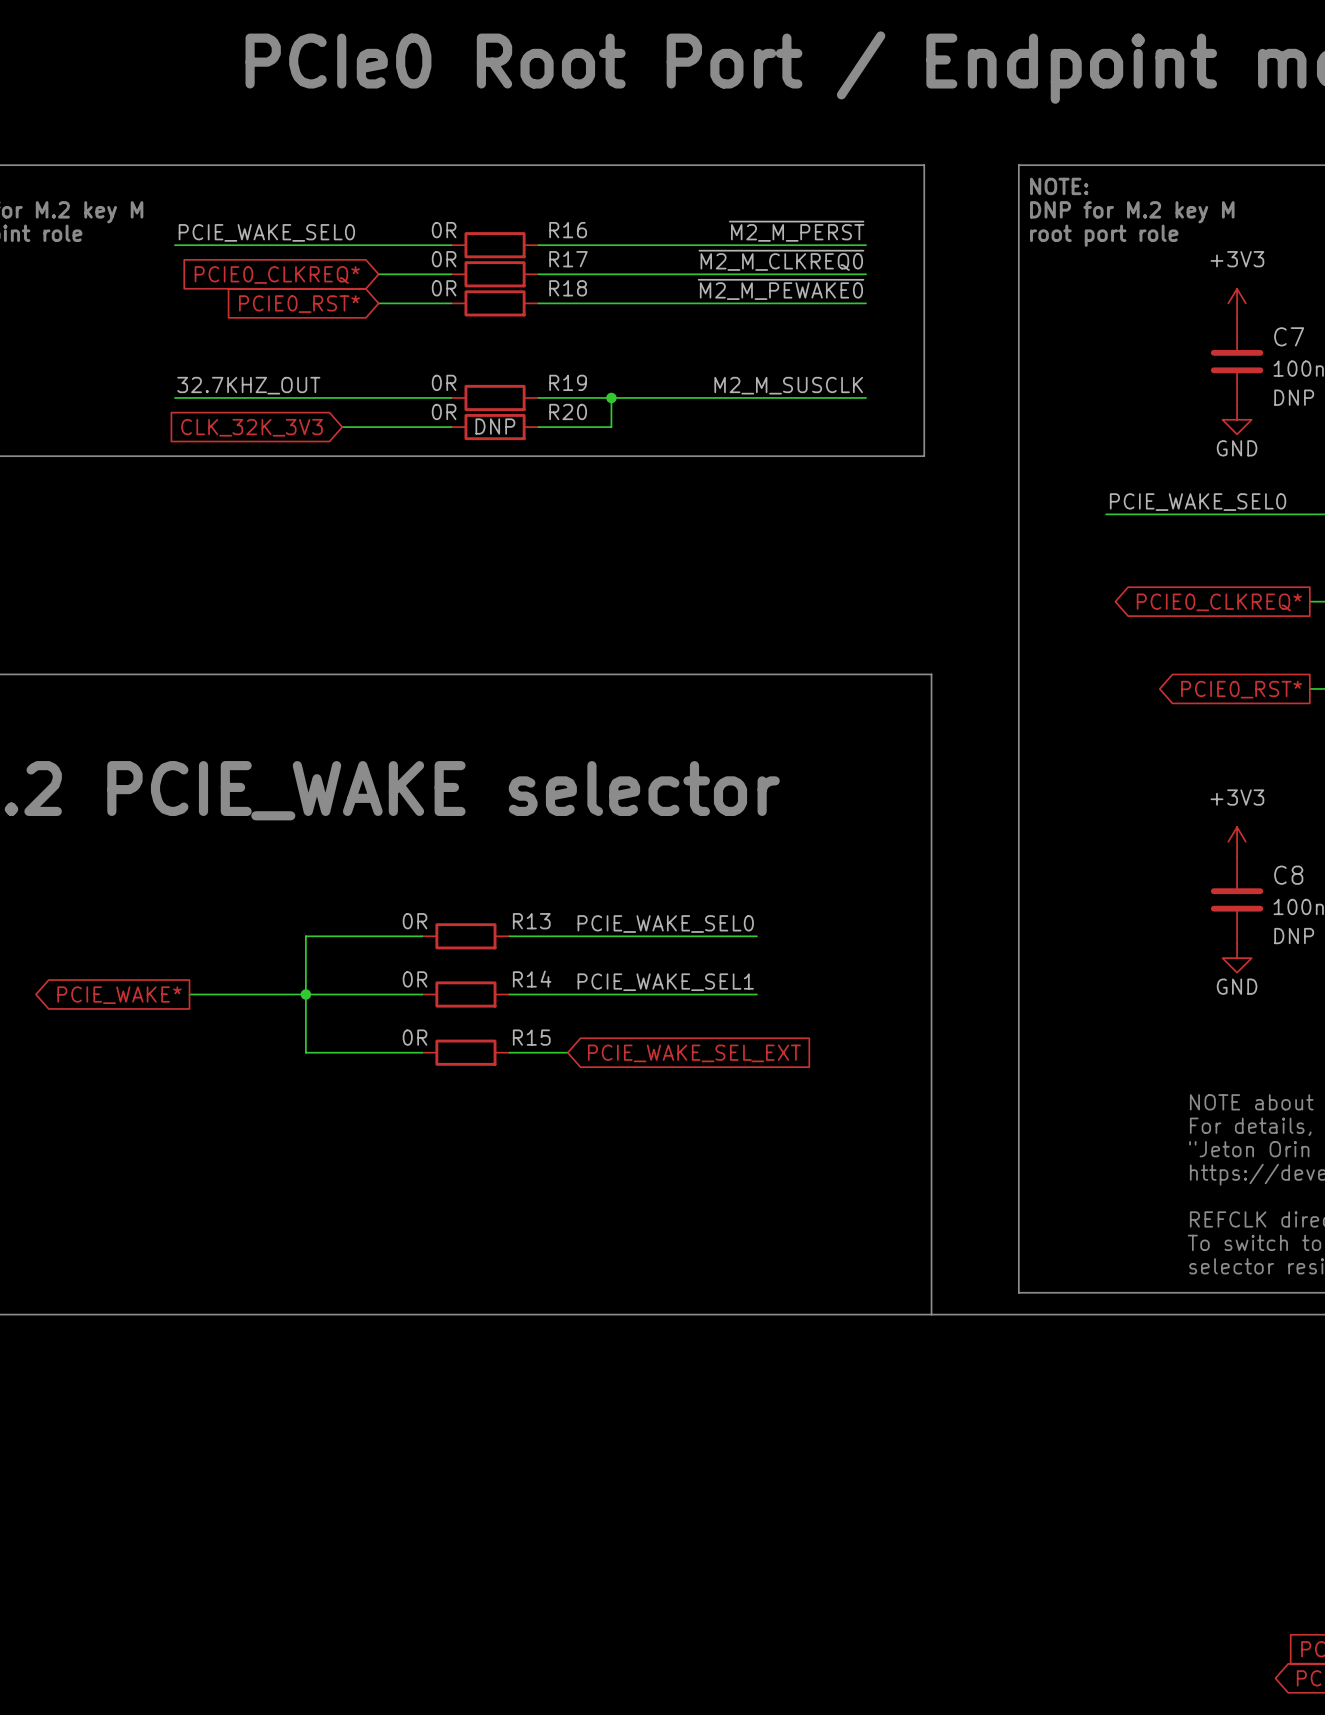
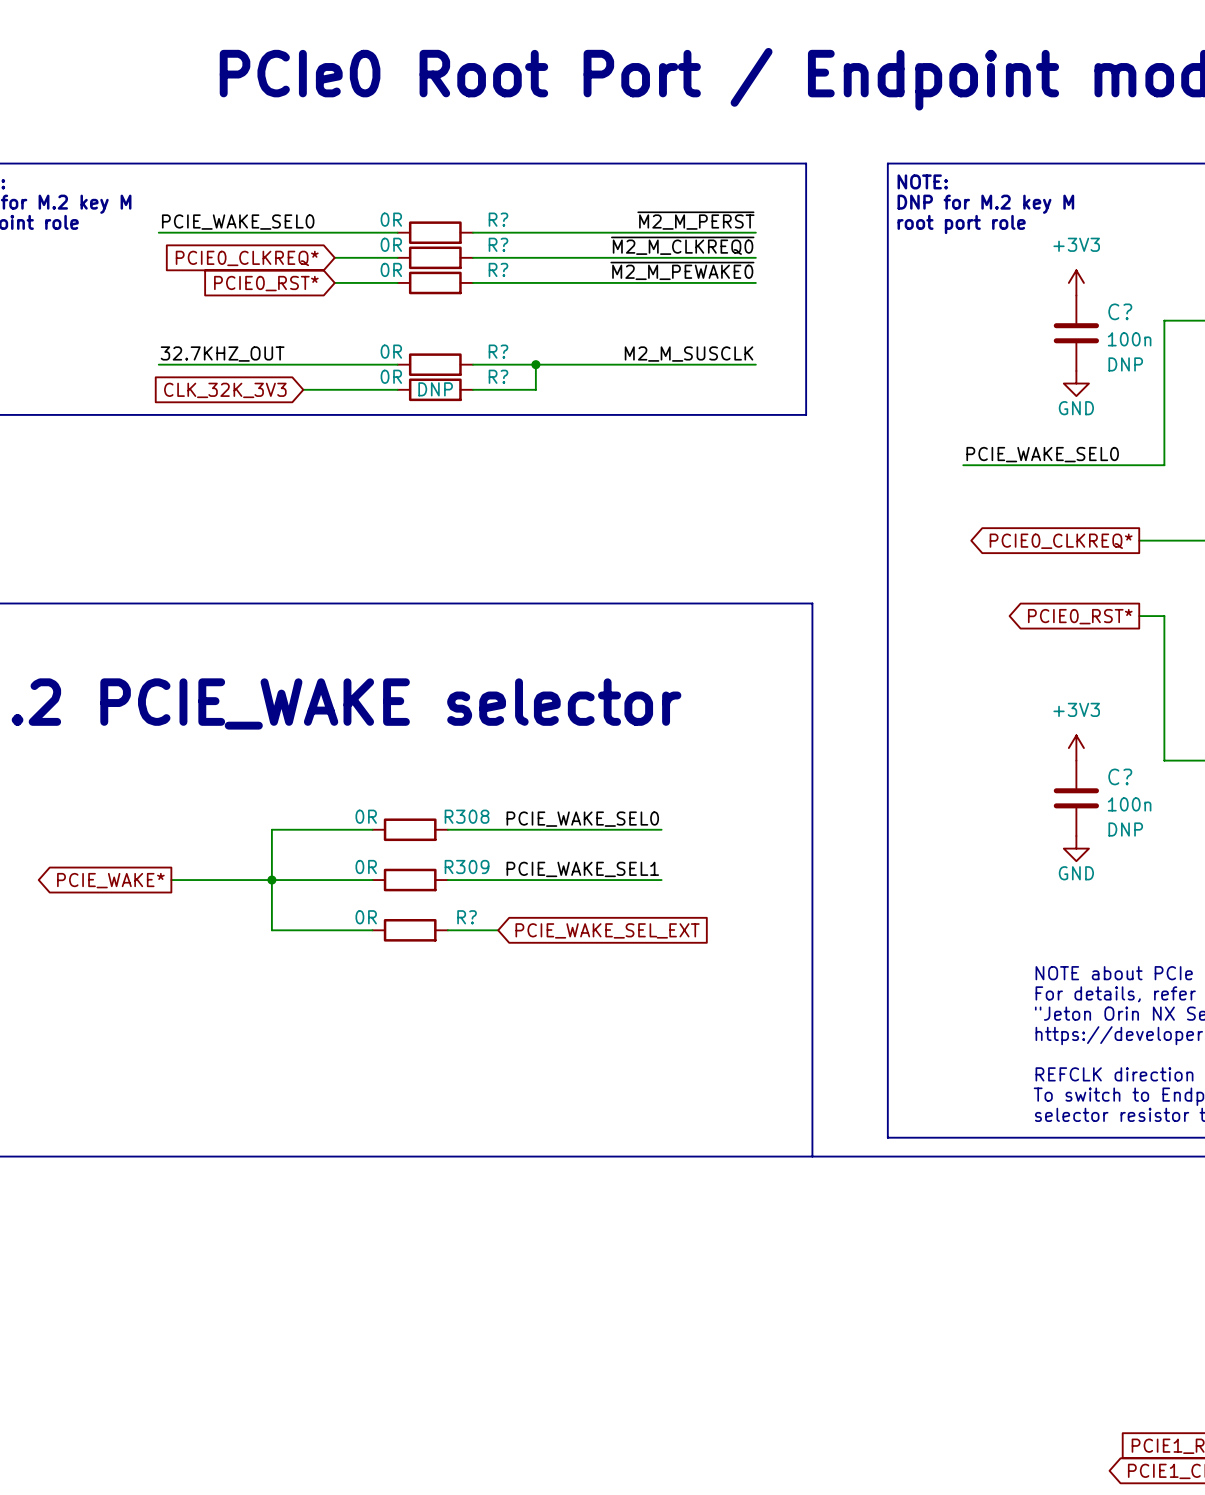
R16 name: R16 (568, 230) -> R? (498, 219)
R17 name: R17 (568, 259) -> R? (498, 244)
R18 name: R18 (568, 288) -> R? (498, 269)
C7 name: C7 (1289, 336) -> C? (1120, 311)
R19 name: R19 (568, 382) -> R? (498, 351)
R20 name: R20 (568, 411) -> R? (498, 376)
C8 name: C8 (1288, 875) -> C? (1120, 776)
R13 name: R13 (531, 921) -> R308 (467, 816)
R14 name: R14 (532, 979) -> R309 (467, 866)
R15 name: R15 (531, 1037) -> R? (467, 917)

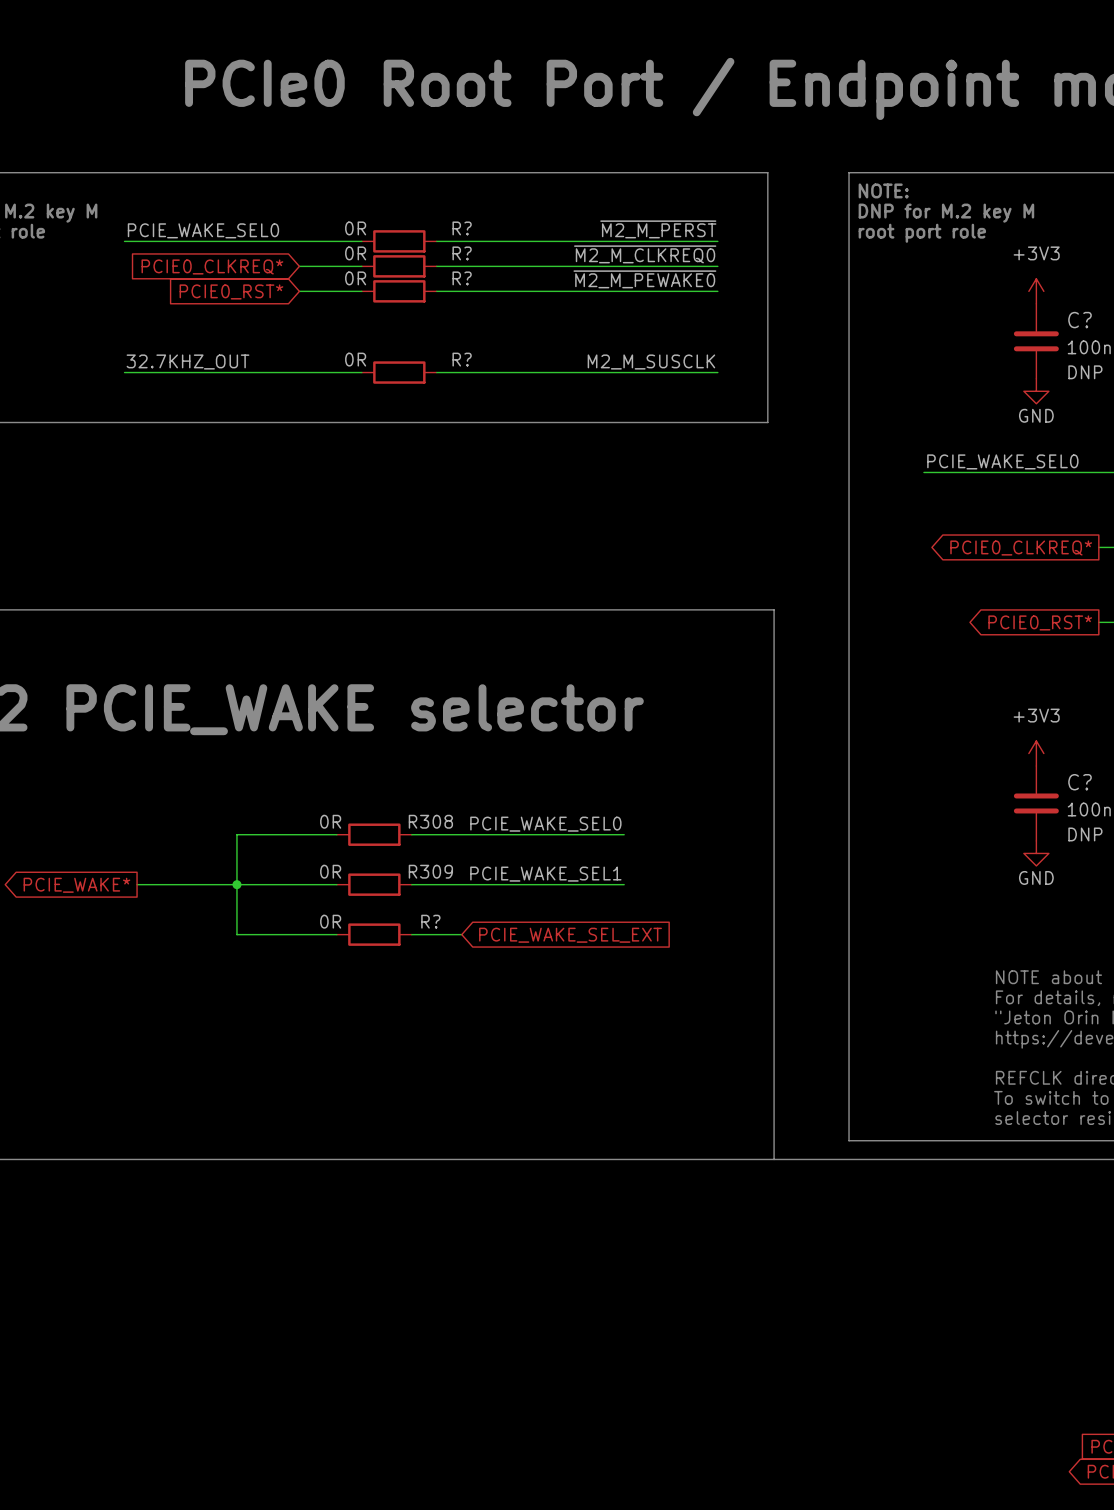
wire: (535, 364) (535, 389) (473, 389) -> none
junction: (535, 364) -> none
wire: (303, 389) (397, 389) -> none
R?: (435, 389) -> none
global label: CLK_32K_3V3 (225, 390) -> none

